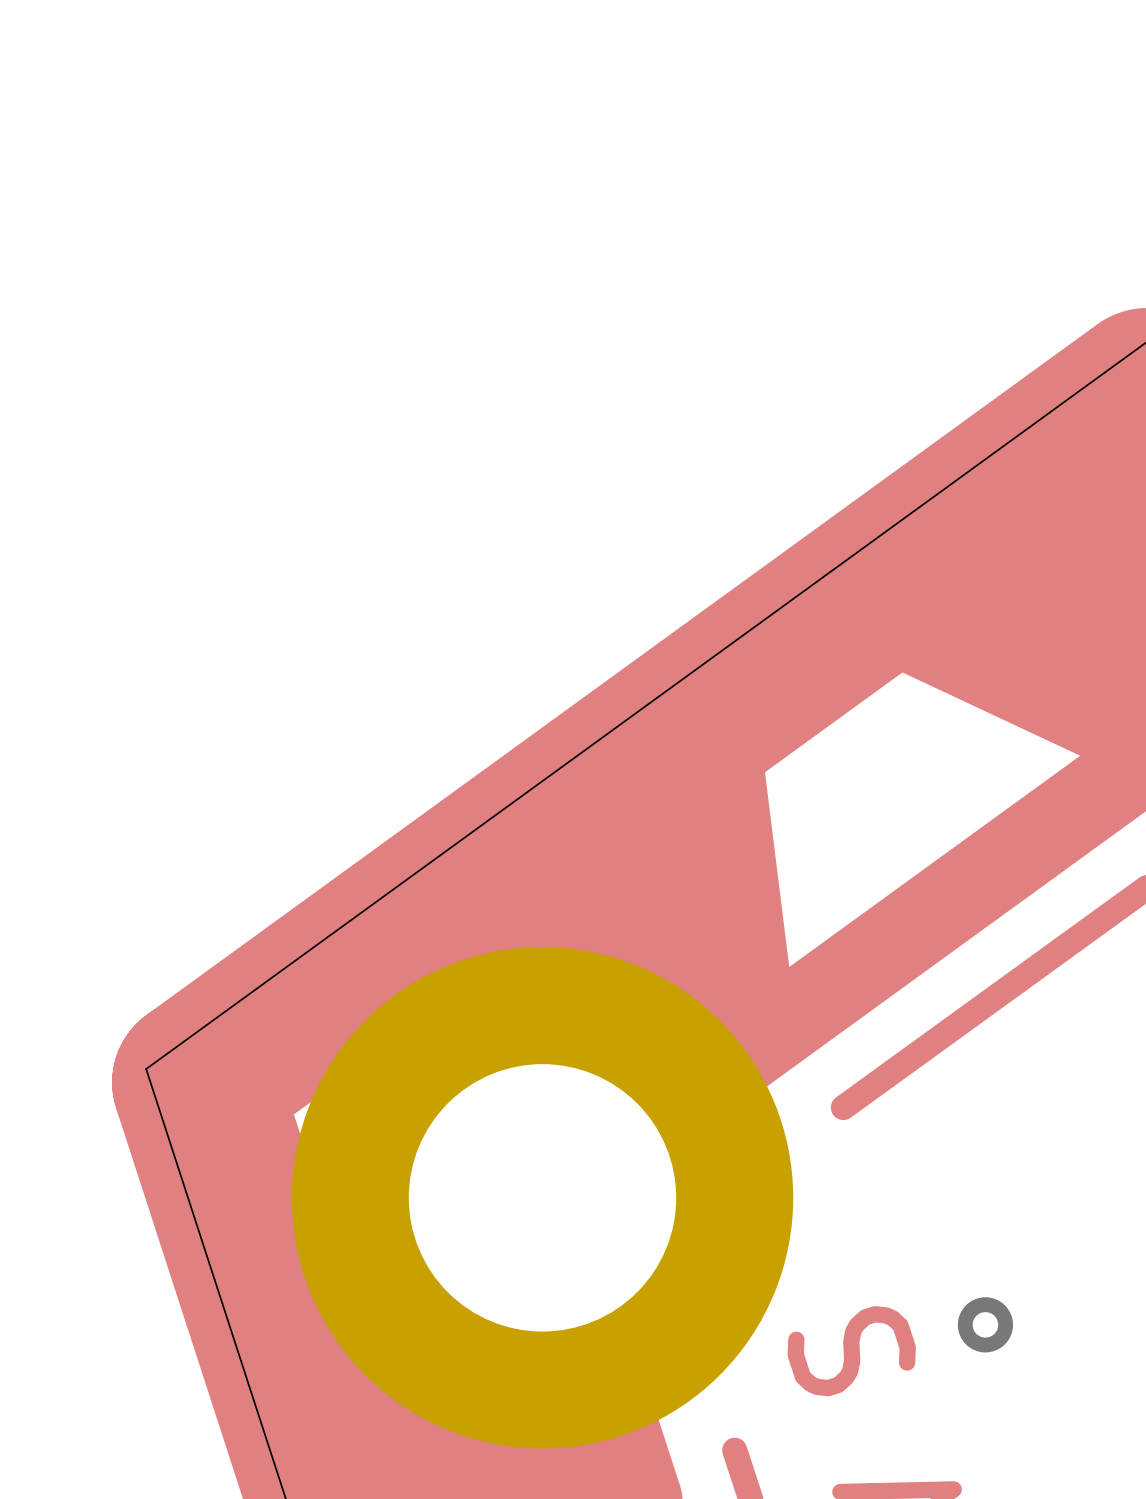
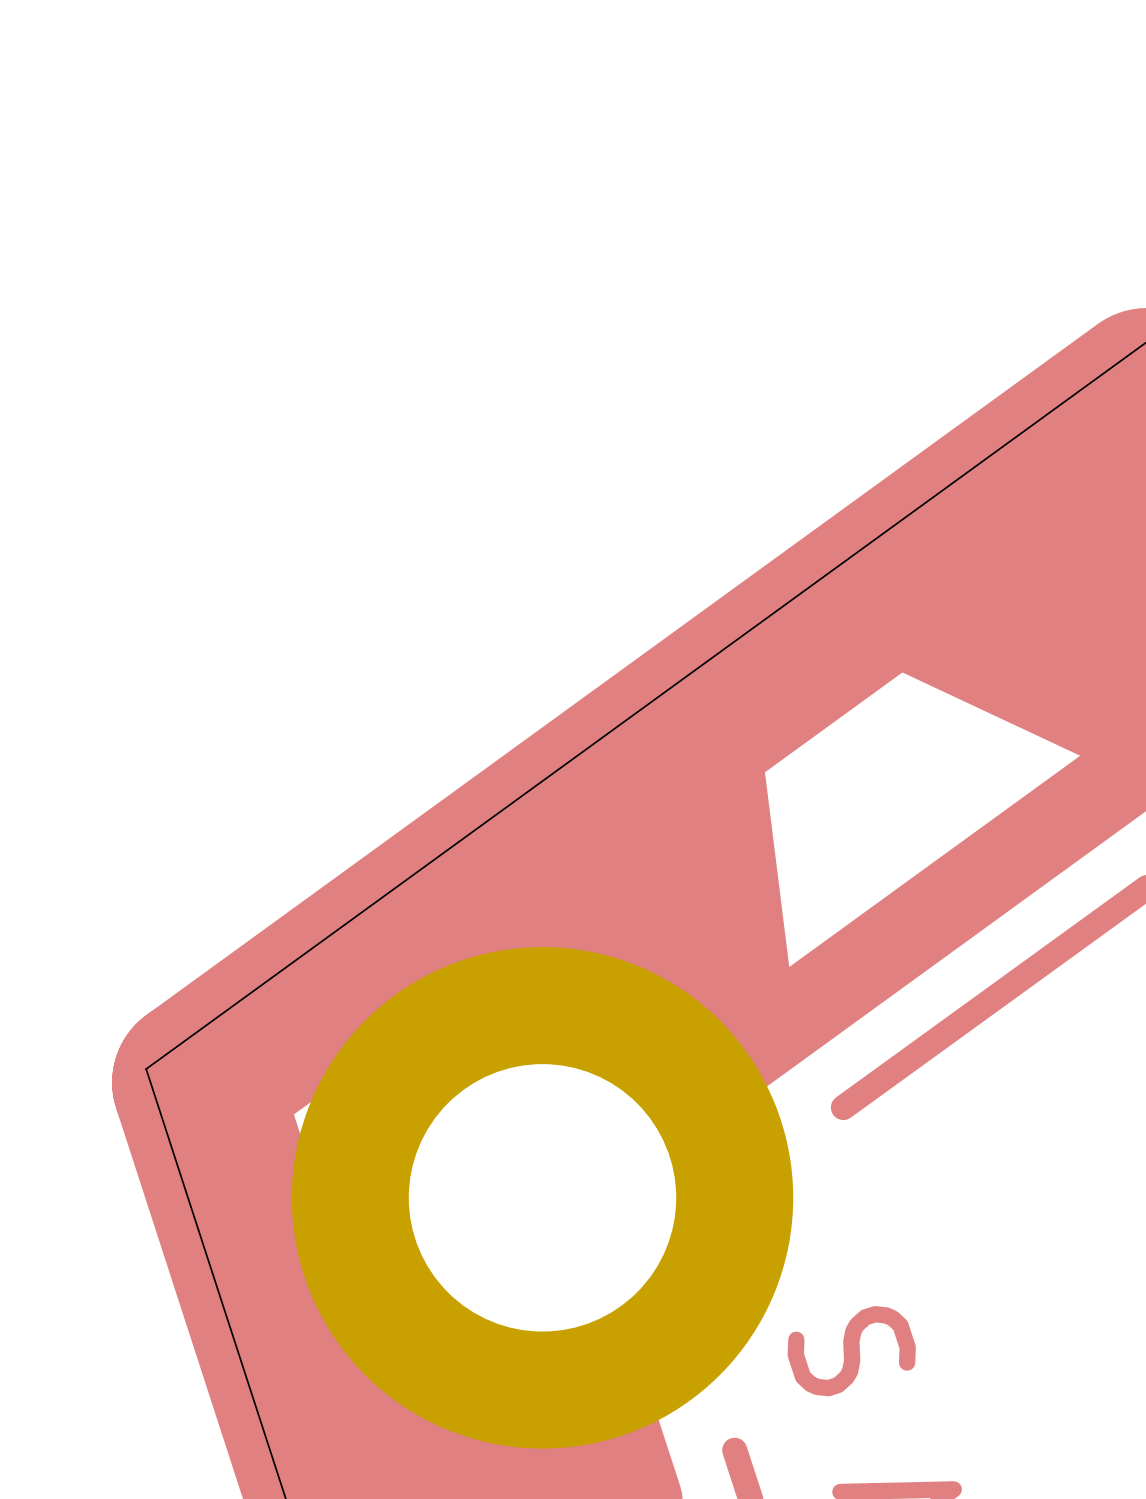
via: (985, 1324) -> none

